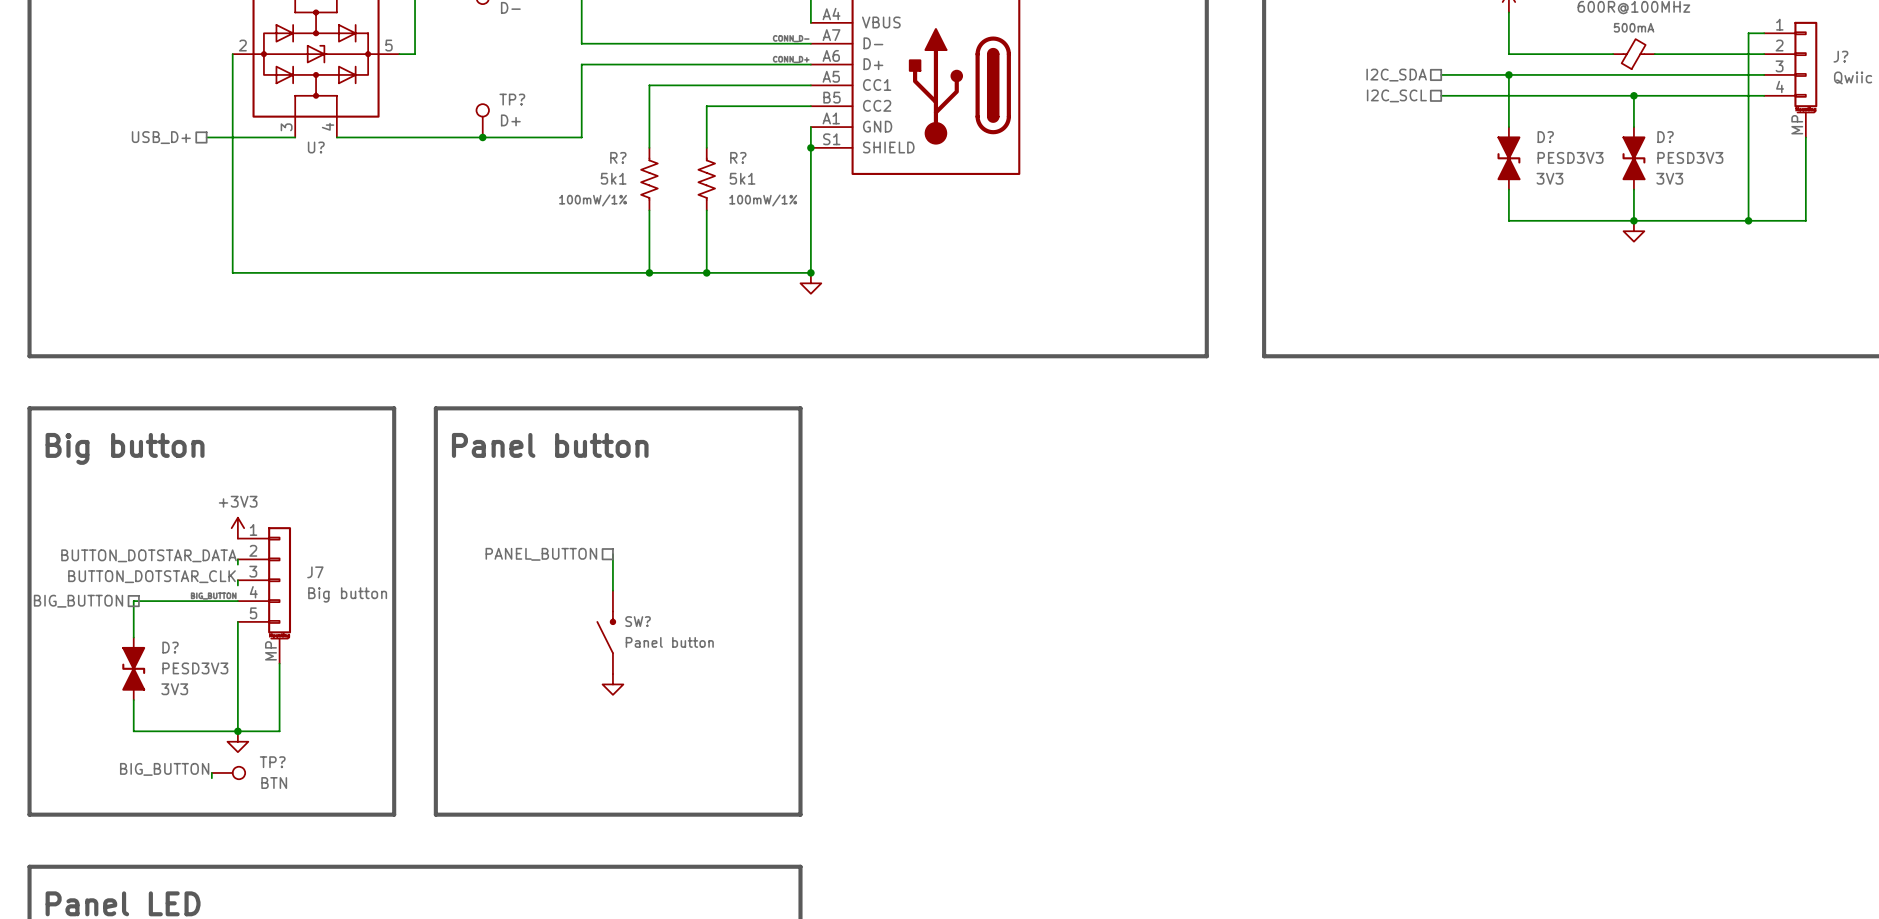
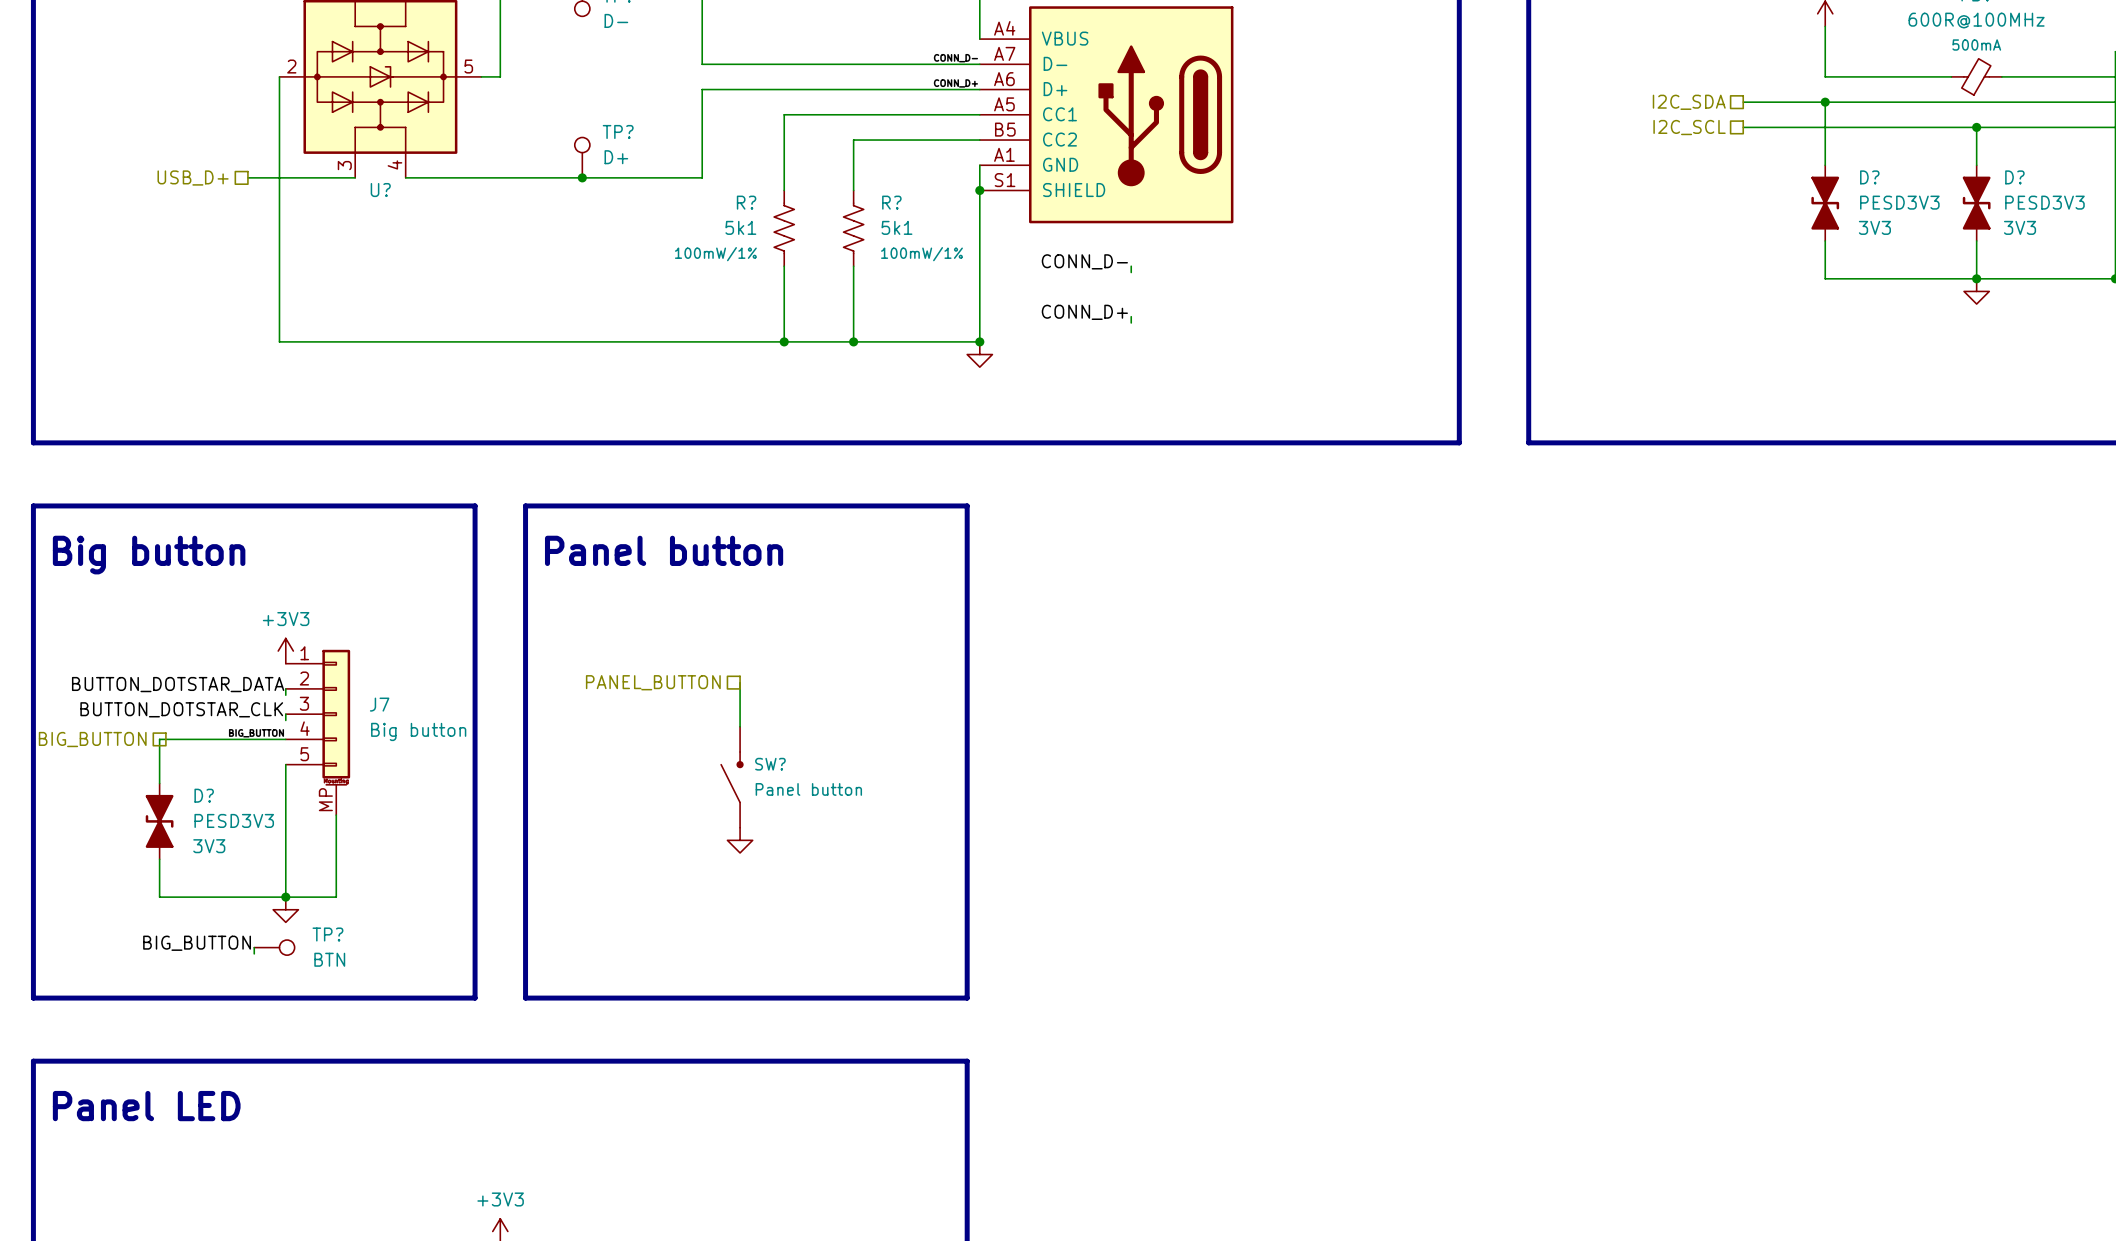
label: none -> CONN_D- (1084, 261)
wire: none -> (1131, 266) (1131, 272)
label: none -> CONN_D+ (1084, 312)
wire: none -> (1131, 316) (1131, 322)

